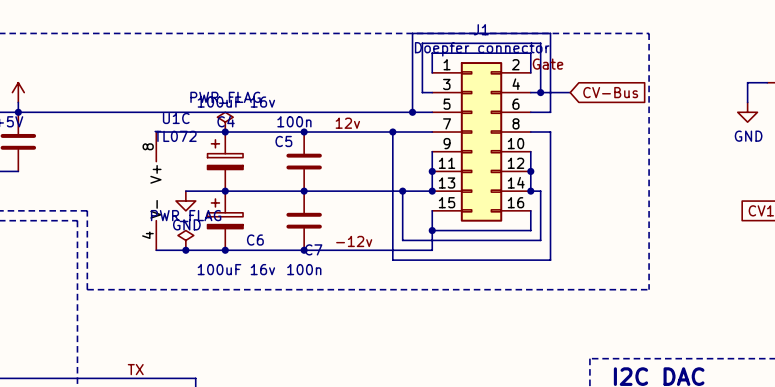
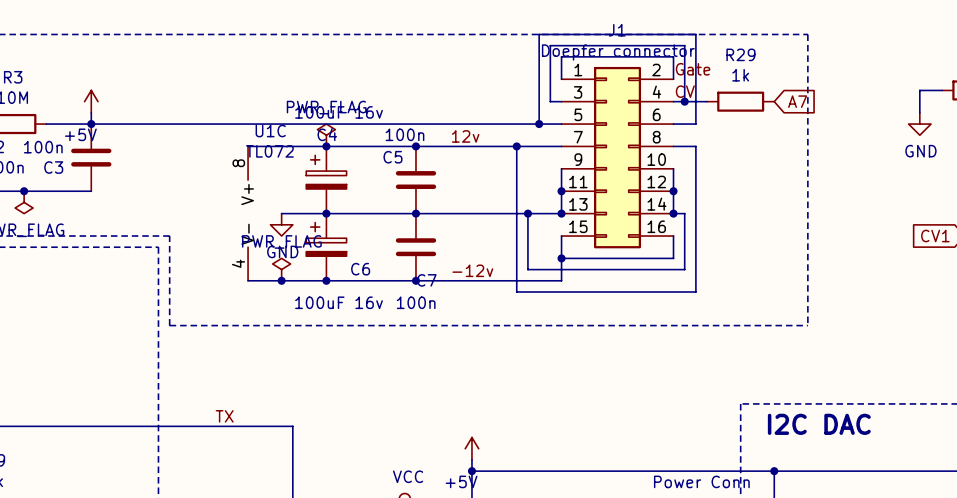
label: none -> CV (685, 91)
R29: none -> 1k (740, 101)
global label: CV-Bus (610, 92) -> none
global label: none -> A7 (797, 101)

